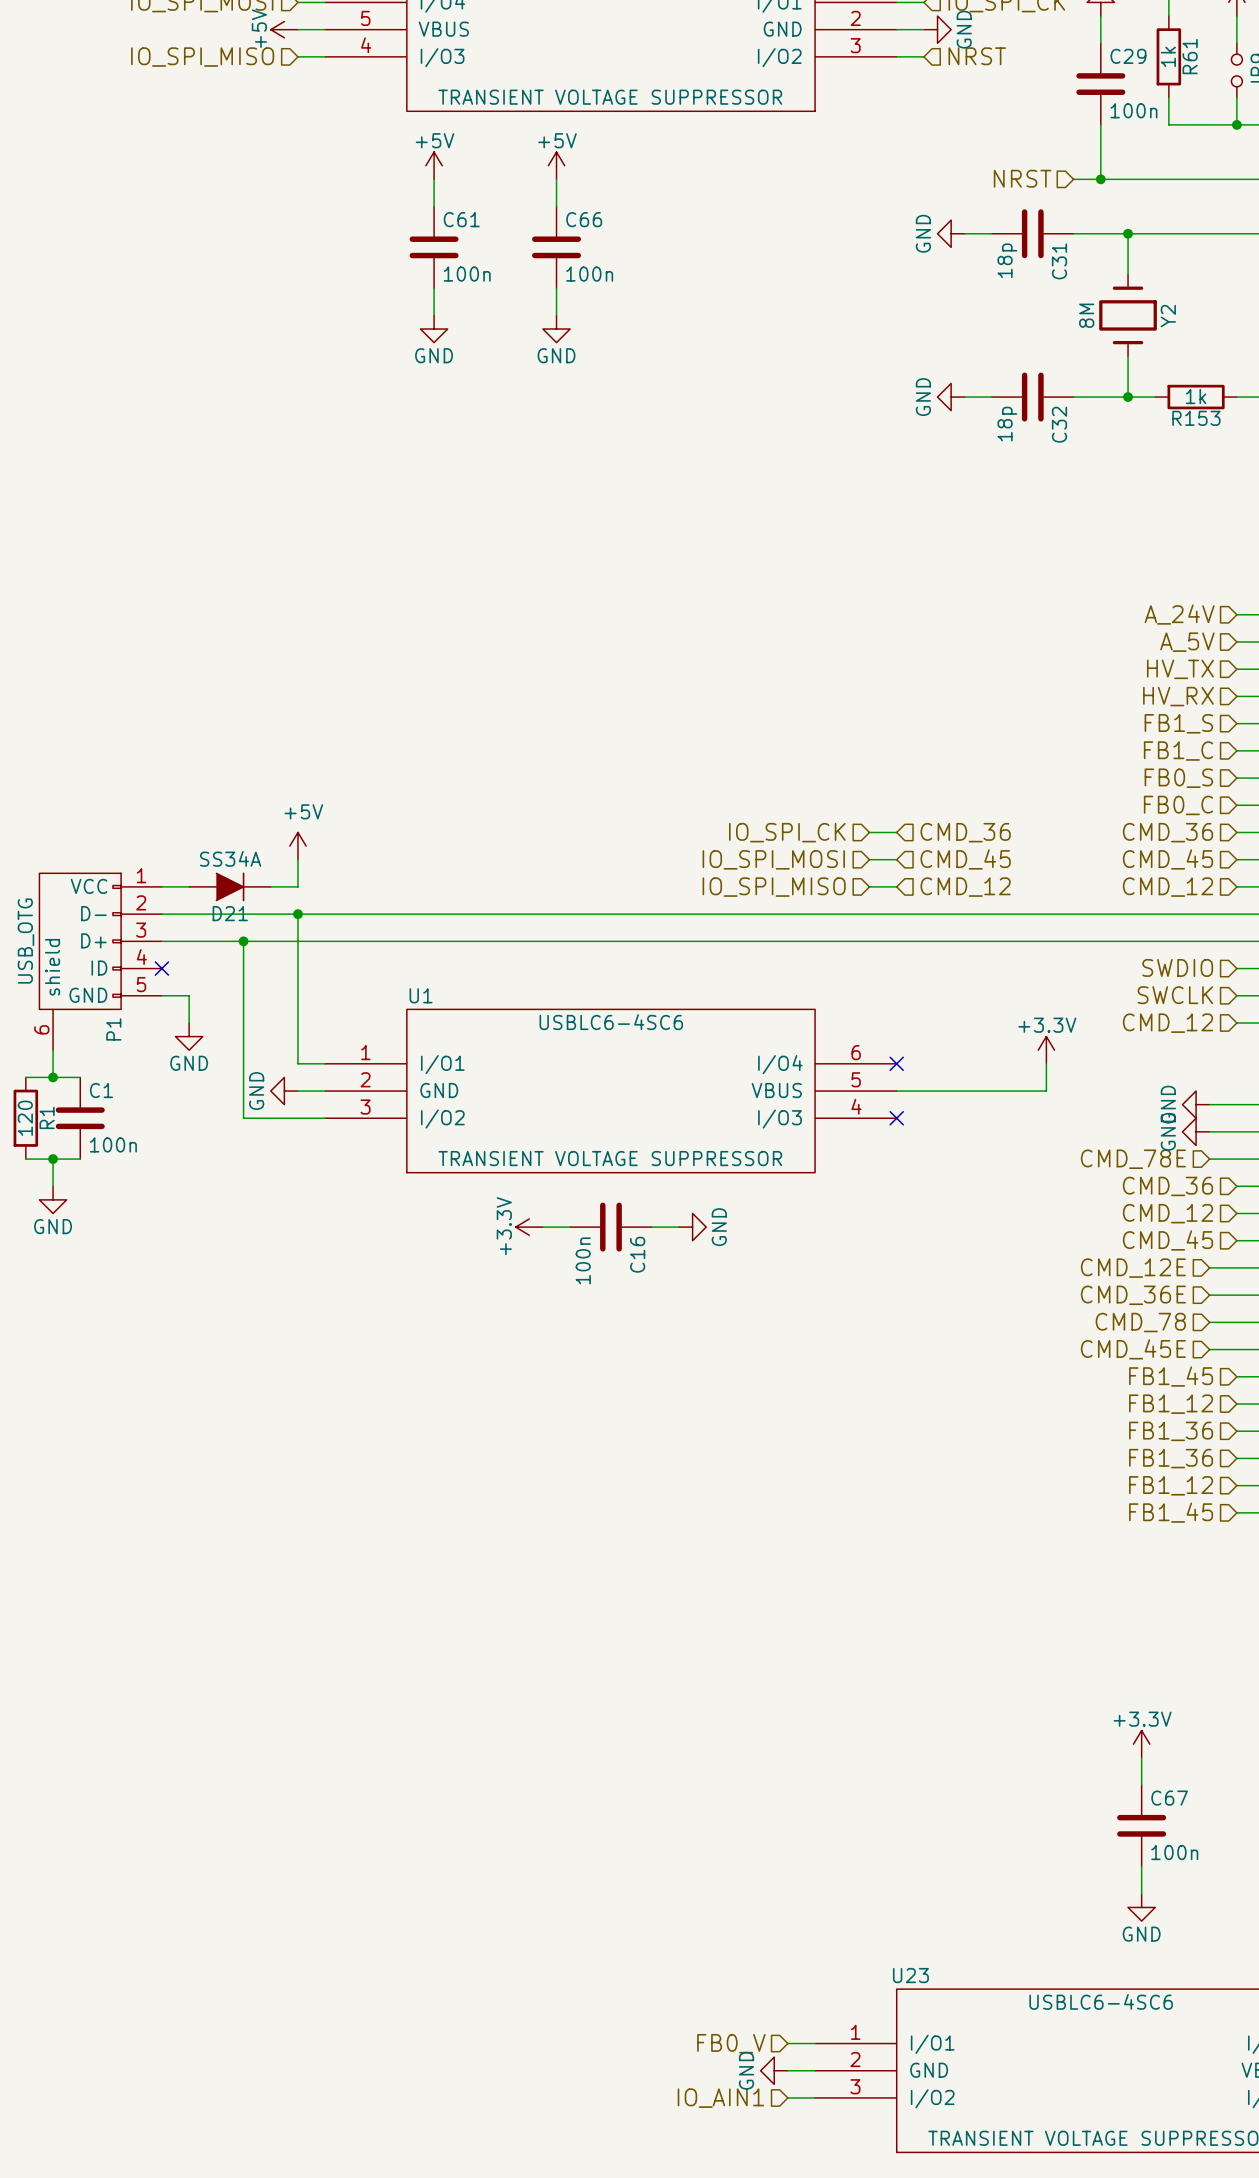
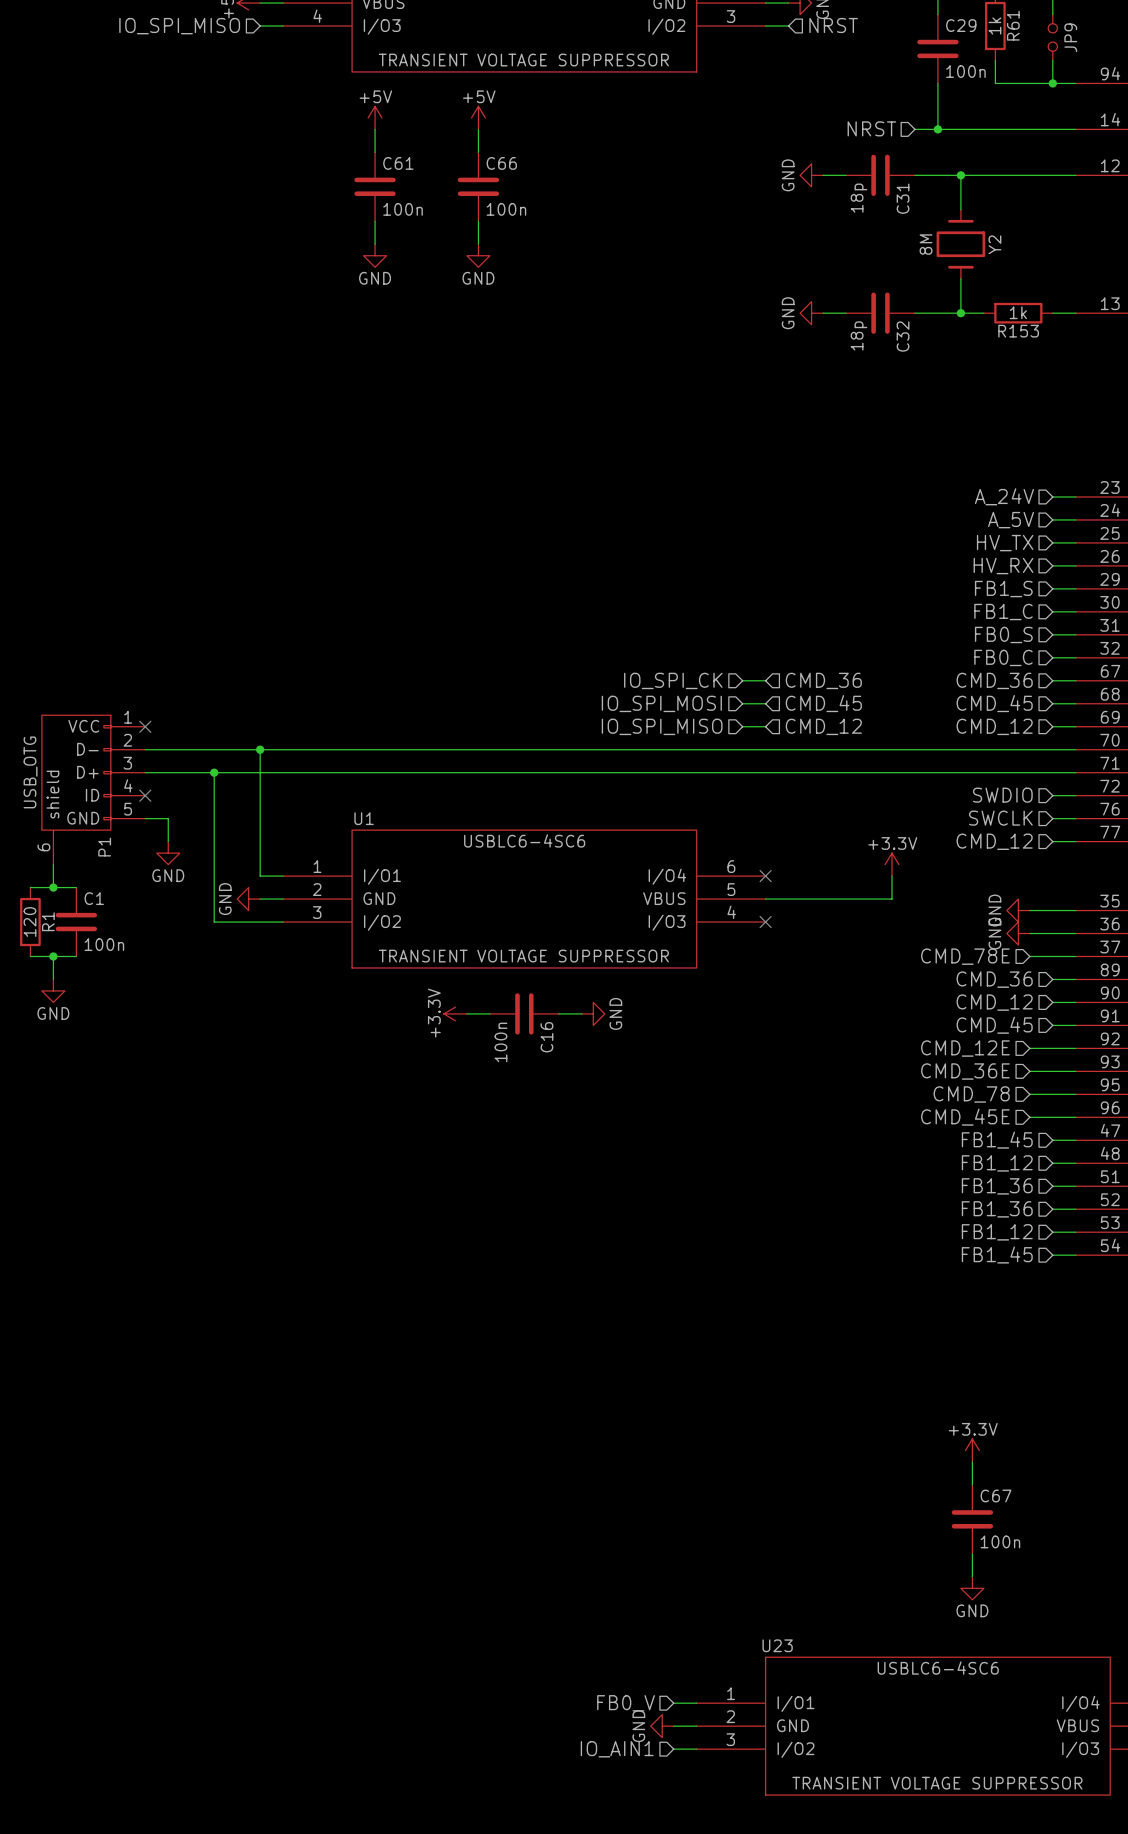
power symbol: +5V (297, 846) -> none
wire: (297, 859) (297, 886) (270, 886) -> none
wire: (161, 886) (189, 886) -> none
no-connect mark: none -> (145, 726)
D21: SS34A (229, 886) -> none

